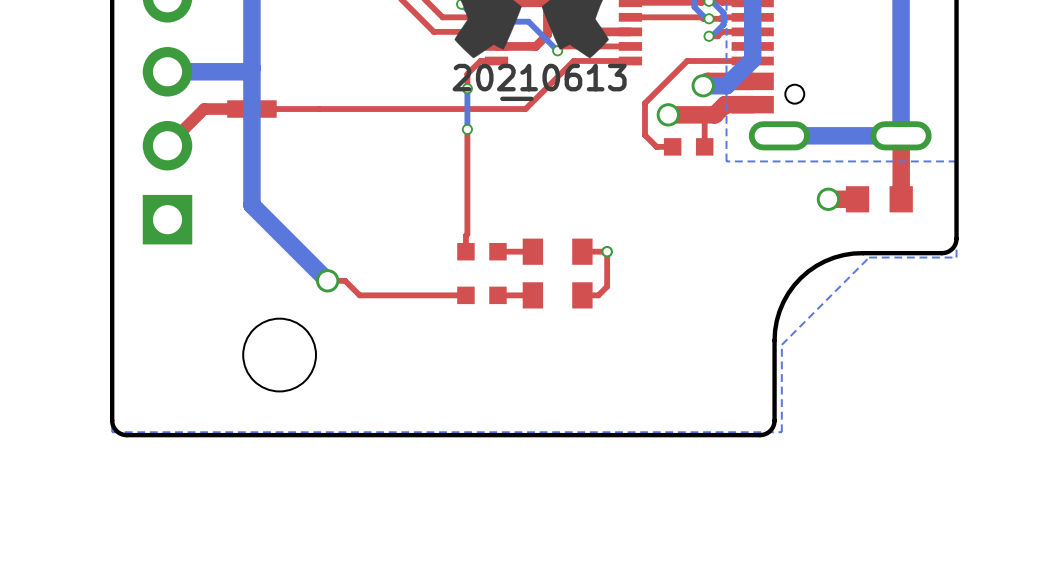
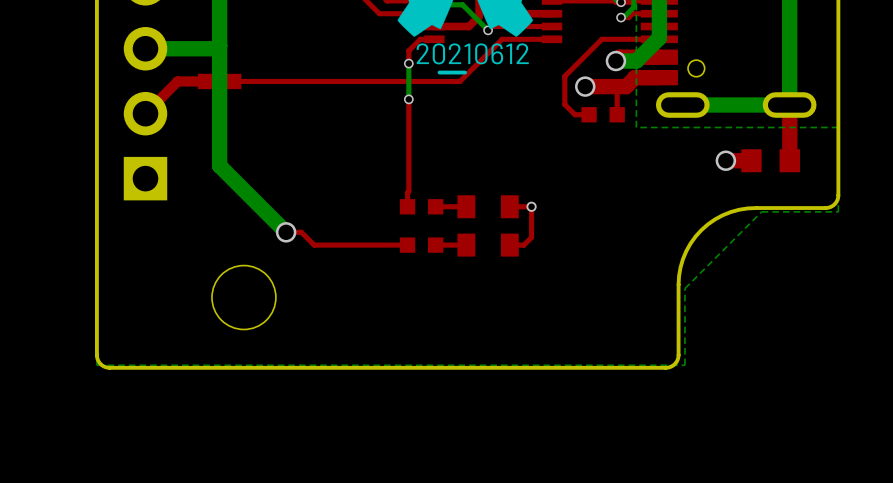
drawing shape: [452, 63, 627, 102] -> [416, 43, 529, 75]

